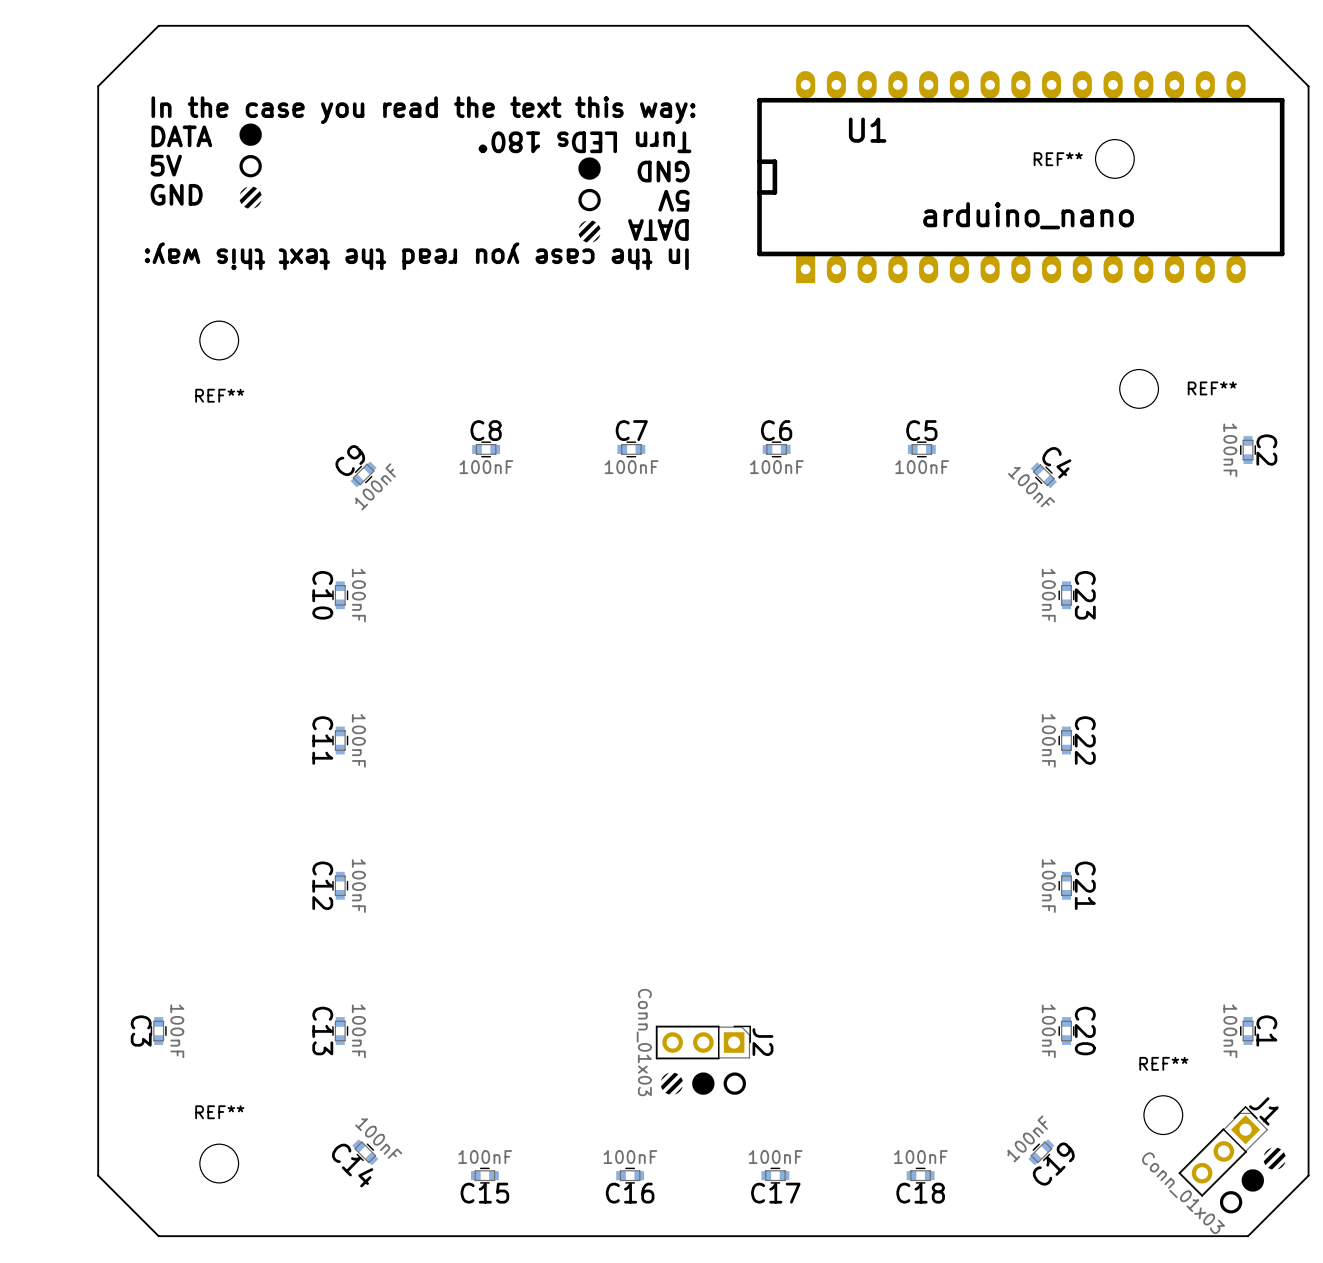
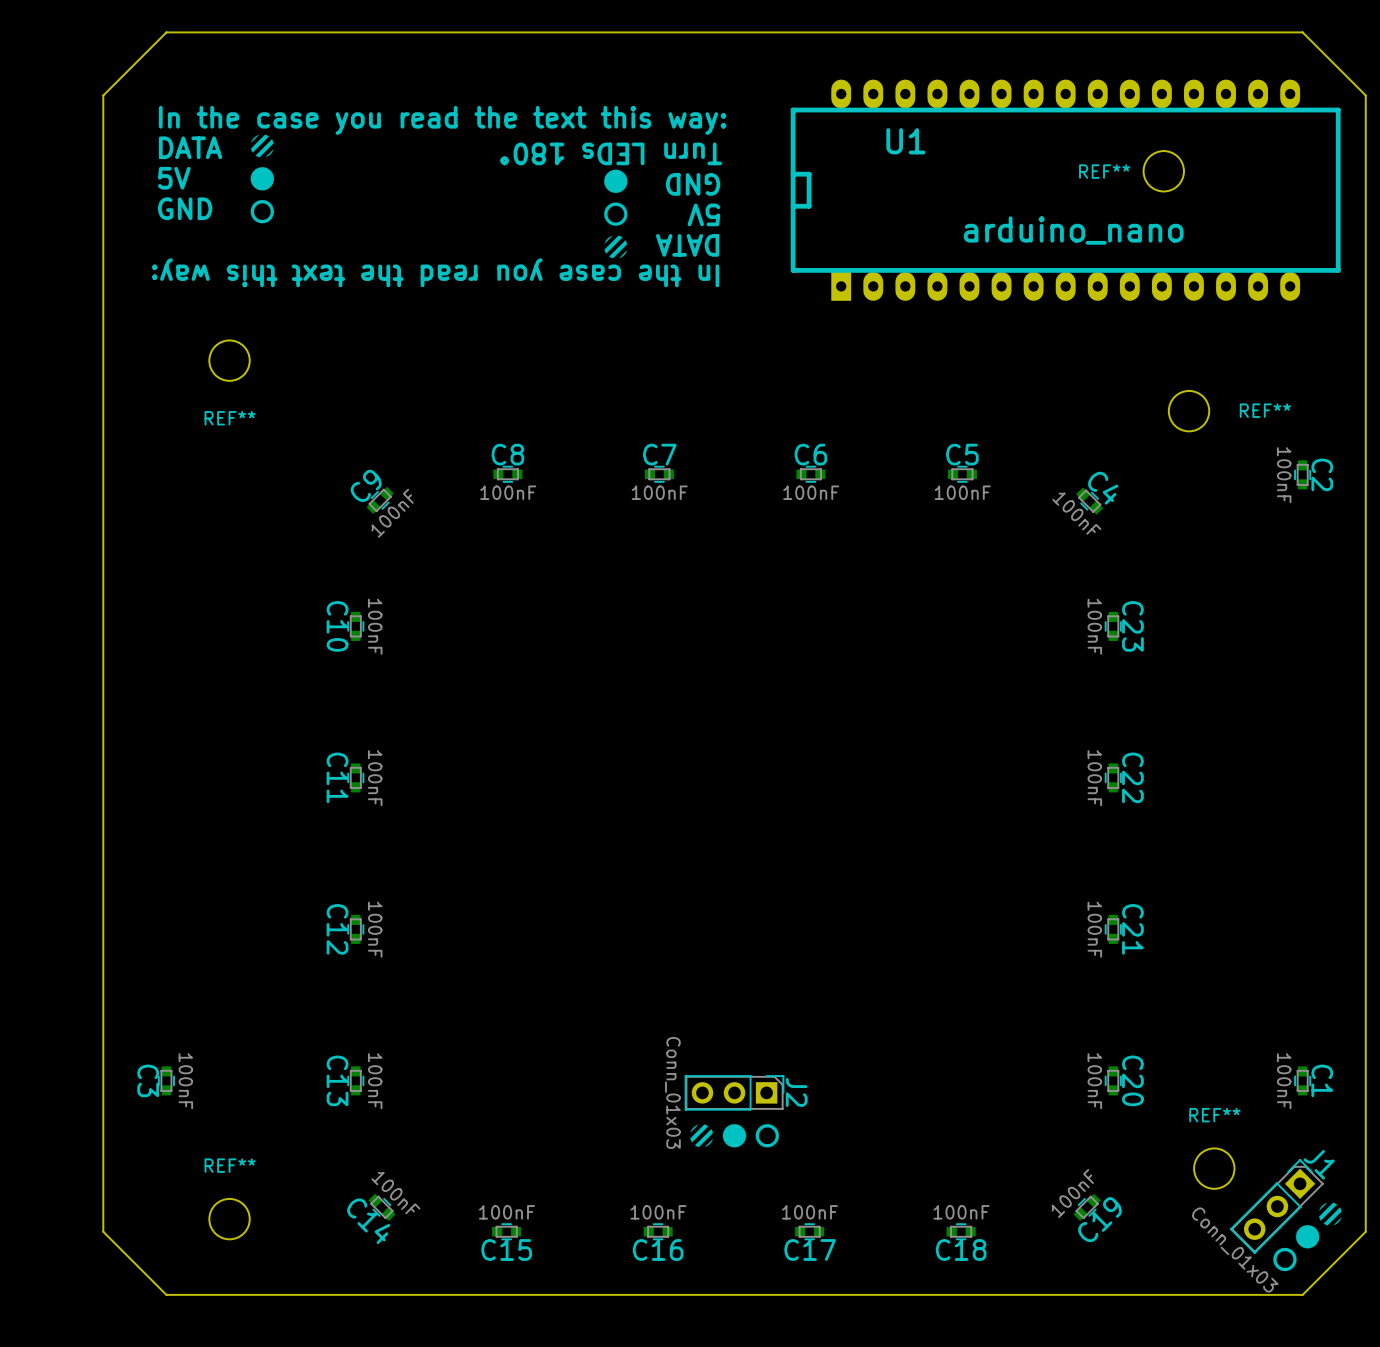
drawing position: (250, 134) -> (262, 178)
drawing position: (250, 166) -> (262, 211)
drawing position: (250, 197) -> (262, 145)

